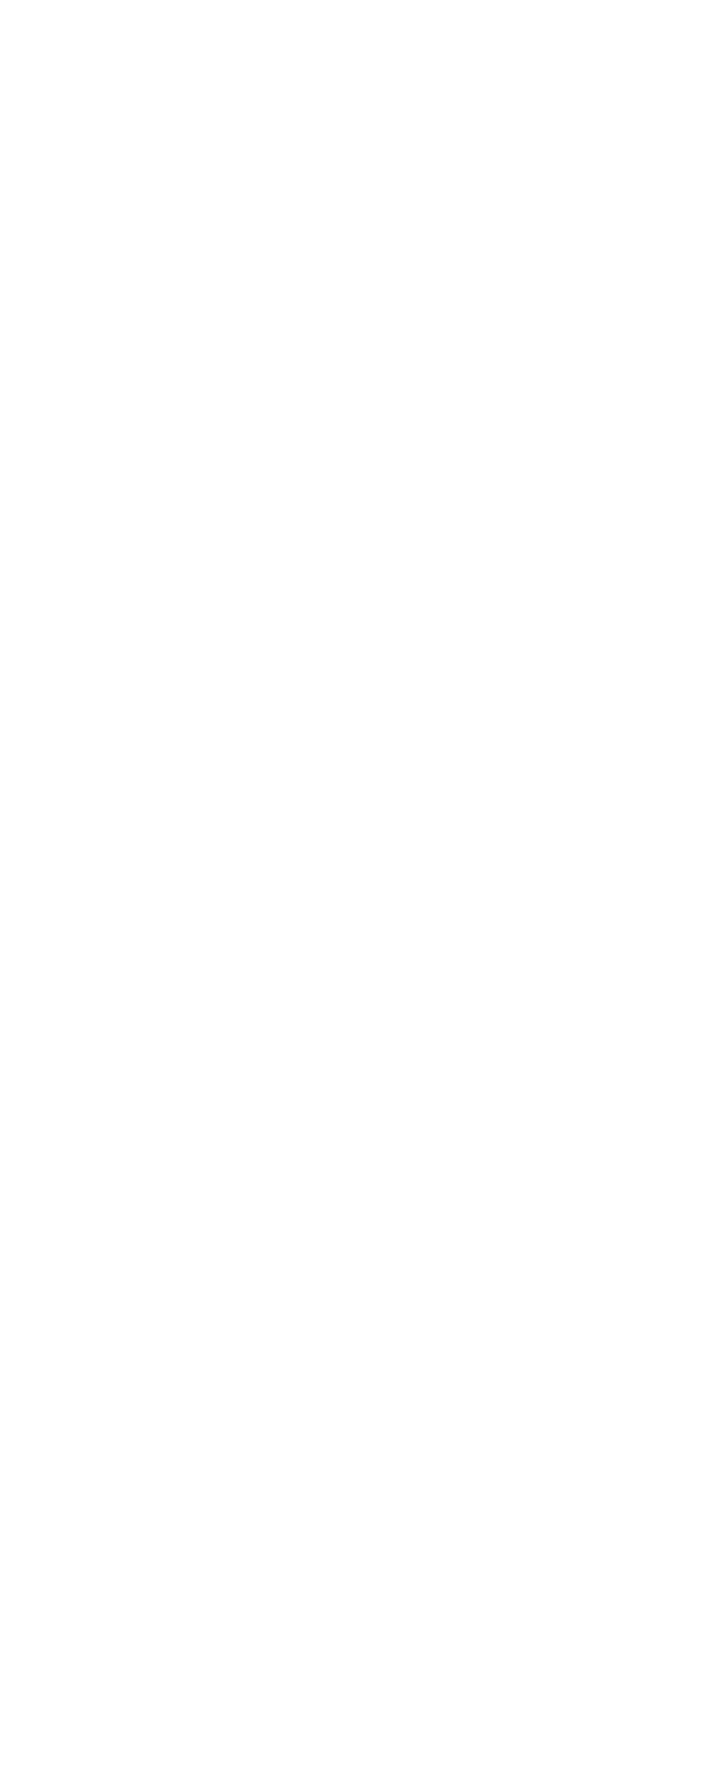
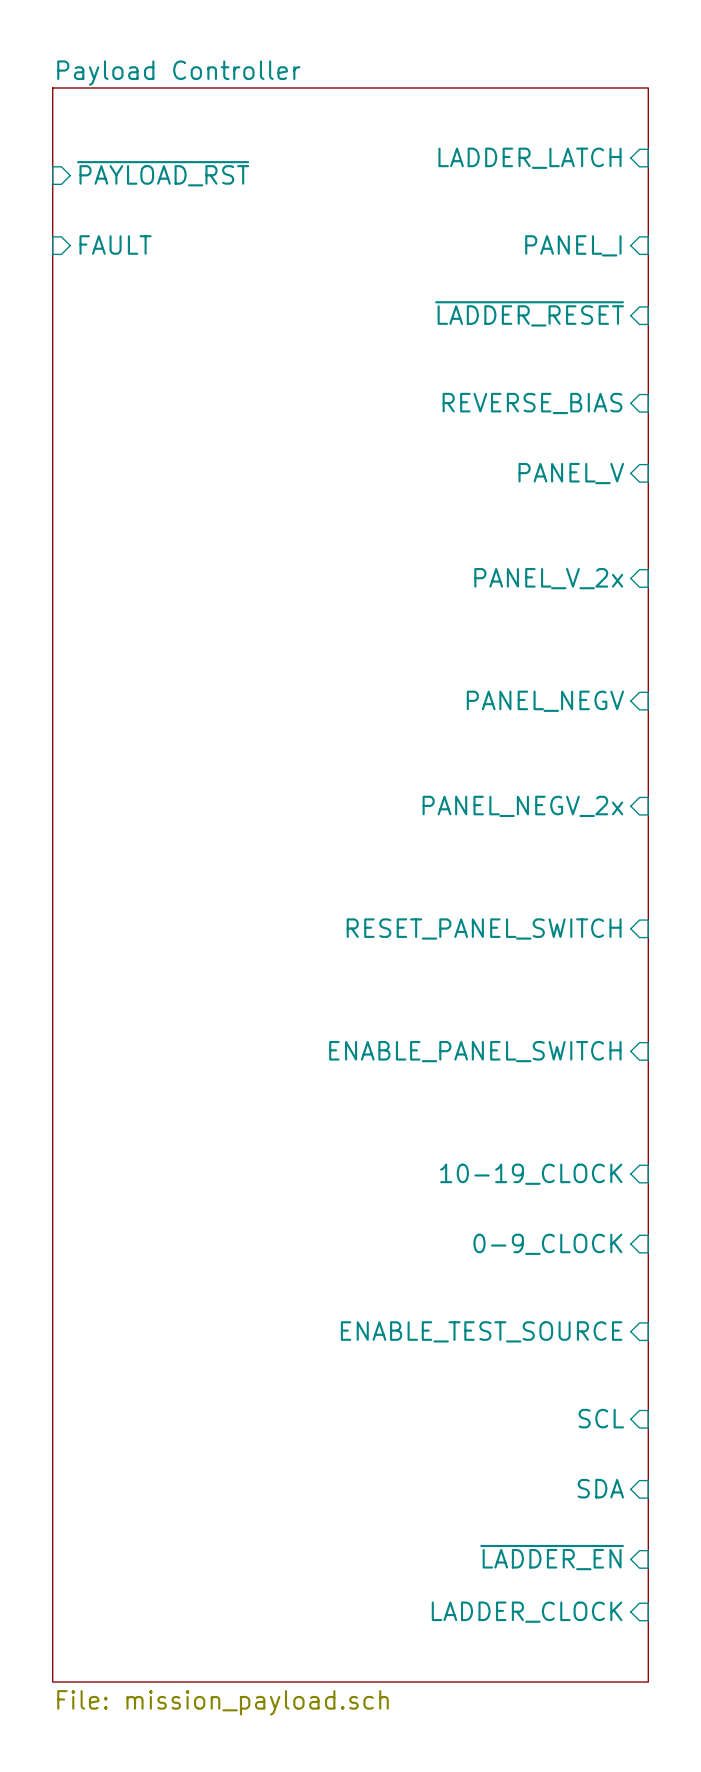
sheet pin: none -> LADDER_LATCH (529, 158)
sheet pin: none -> ~{PAYLOAD_RST} (163, 173)
sheet pin: none -> FAULT (115, 244)
sheet pin: none -> PANEL_I (573, 245)
sheet pin: none -> ~{LADDER_RESET} (529, 313)
sheet pin: none -> REVERSE_BIAS (532, 403)
sheet pin: none -> PANEL_V (571, 473)
sheet pin: none -> PANEL_V_2x (548, 578)
sheet pin: none -> PANEL_NEGV (545, 701)
sheet pin: none -> PANEL_NEGV_2x (522, 806)
sheet Payload Controller: none -> File: mission_payload.sch (350, 885)
sheet pin: none -> RESET_PANEL_SWITCH (484, 928)
sheet pin: none -> ENABLE_PANEL_SWITCH (475, 1051)
sheet pin: none -> 10-19_CLOCK (531, 1174)
sheet pin: none -> 0-9_CLOCK (547, 1244)
sheet pin: none -> ENABLE_TEST_SOURCE (481, 1331)
sheet pin: none -> SCL (601, 1418)
sheet pin: none -> SDA (600, 1488)
sheet pin: none -> ~{LADDER_EN} (552, 1557)
sheet pin: none -> LADDER_CLOCK (527, 1612)

